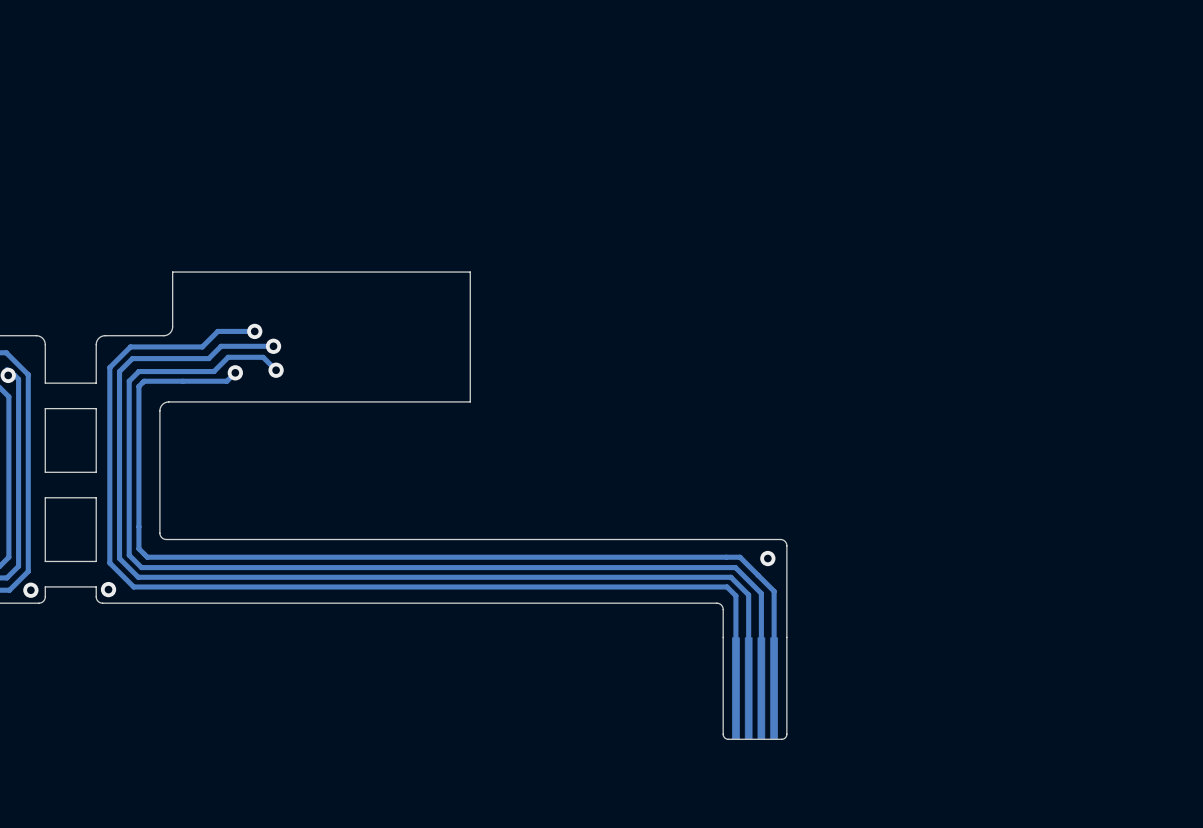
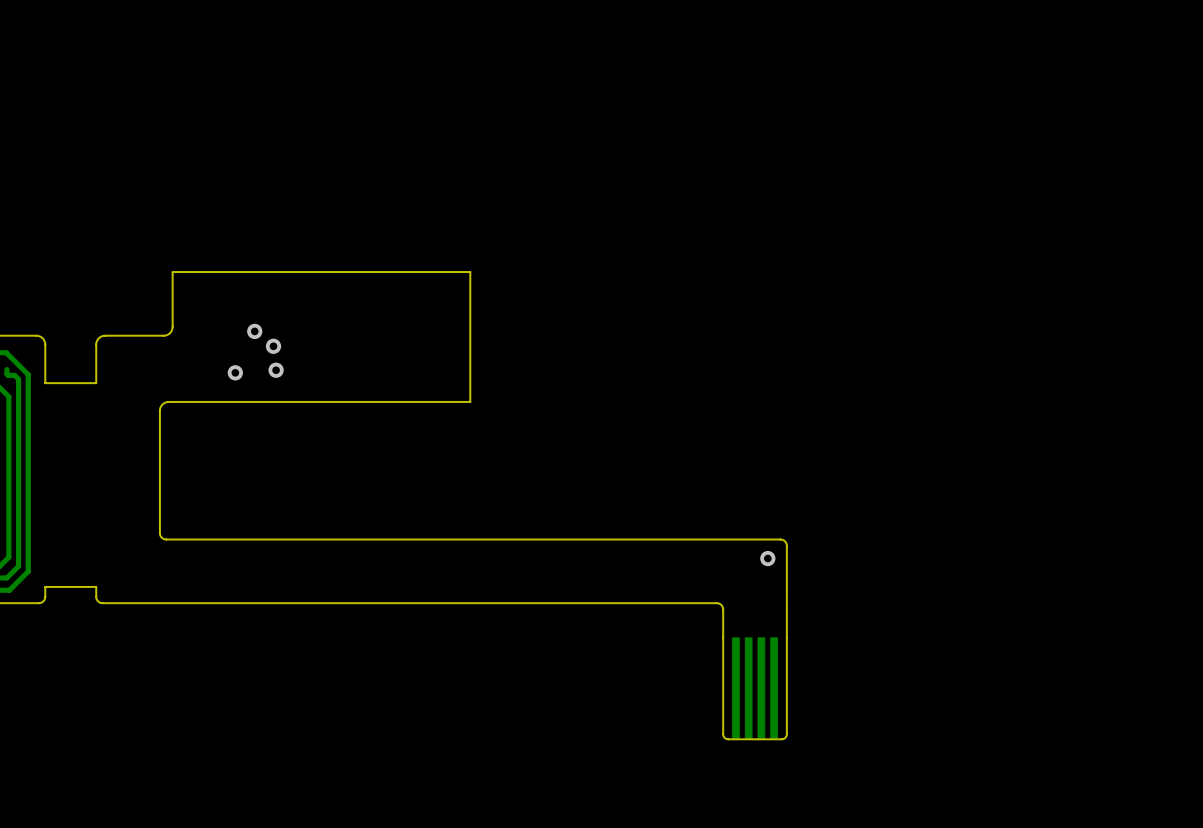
track: (254, 331) (217, 331) (202, 346) (130, 346) (109, 367) (109, 563) (133, 586) (727, 586) (735, 595) (735, 688) -> none
track: (273, 346) (221, 346) (208, 358) (132, 358) (119, 371) (119, 558) (138, 577) (730, 577) (748, 594) (748, 688) -> none
track: (276, 370) (263, 357) (228, 357) (213, 371) (138, 371) (129, 381) (129, 555) (141, 567) (735, 567) (761, 593) (761, 688) -> none
track: (235, 372) (226, 381) (144, 381) (138, 386) (138, 548) (147, 557) (740, 557) (774, 591) (774, 688) -> none
via: (8, 375) -> none
board edge: (96, 408) (96, 472) (45, 472) (45, 408) (96, 408) -> none
board edge: (96, 497) (96, 561) (45, 561) (45, 497) (96, 497) -> none
via: (108, 589) -> none
via: (30, 590) -> none

